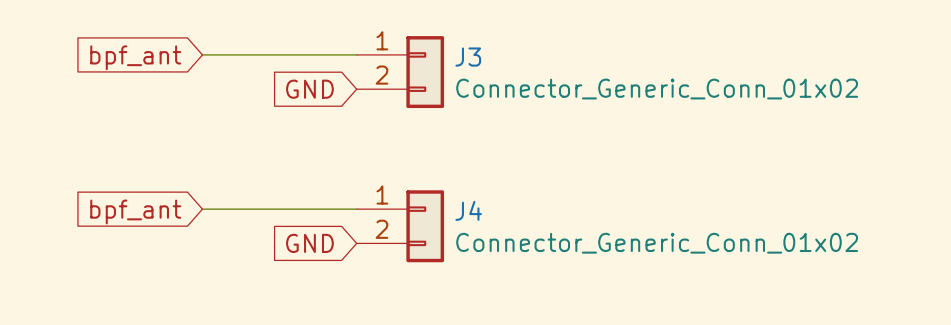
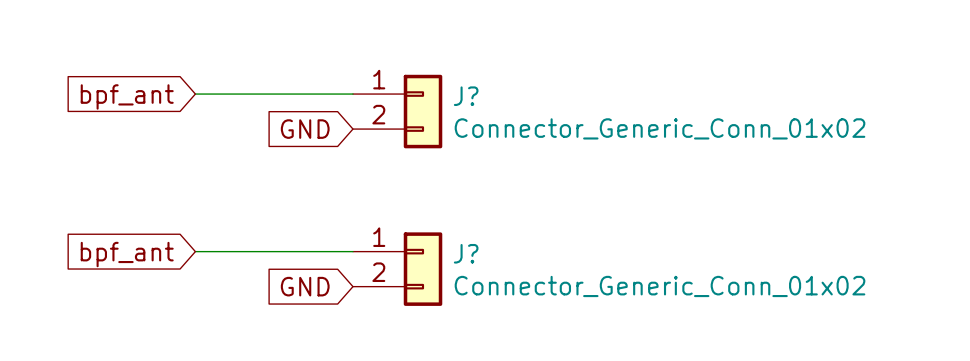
J3 name: J3 (468, 57) -> J? (466, 96)
J4 name: J4 (468, 210) -> J? (466, 253)

